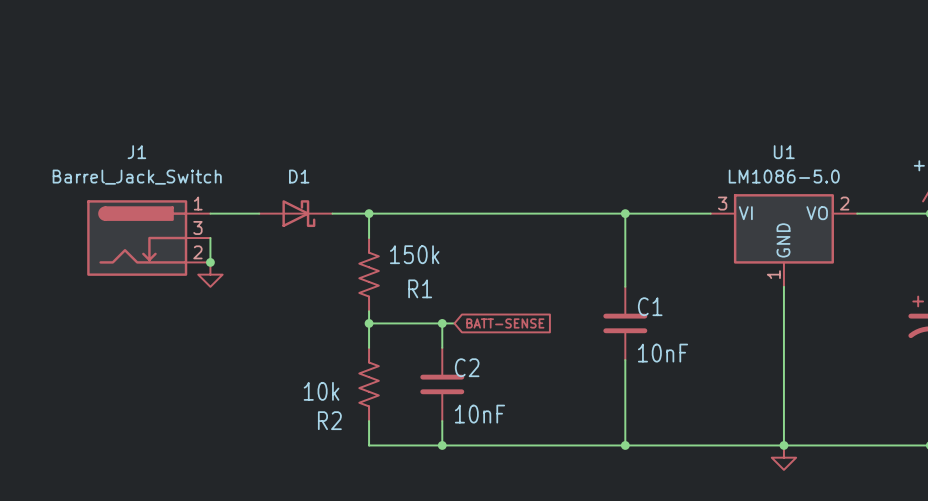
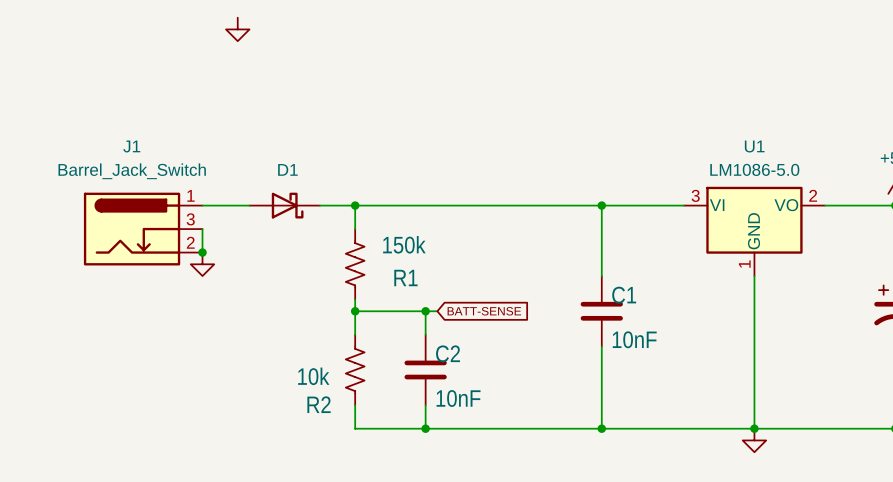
power symbol: none -> (237, 29)

